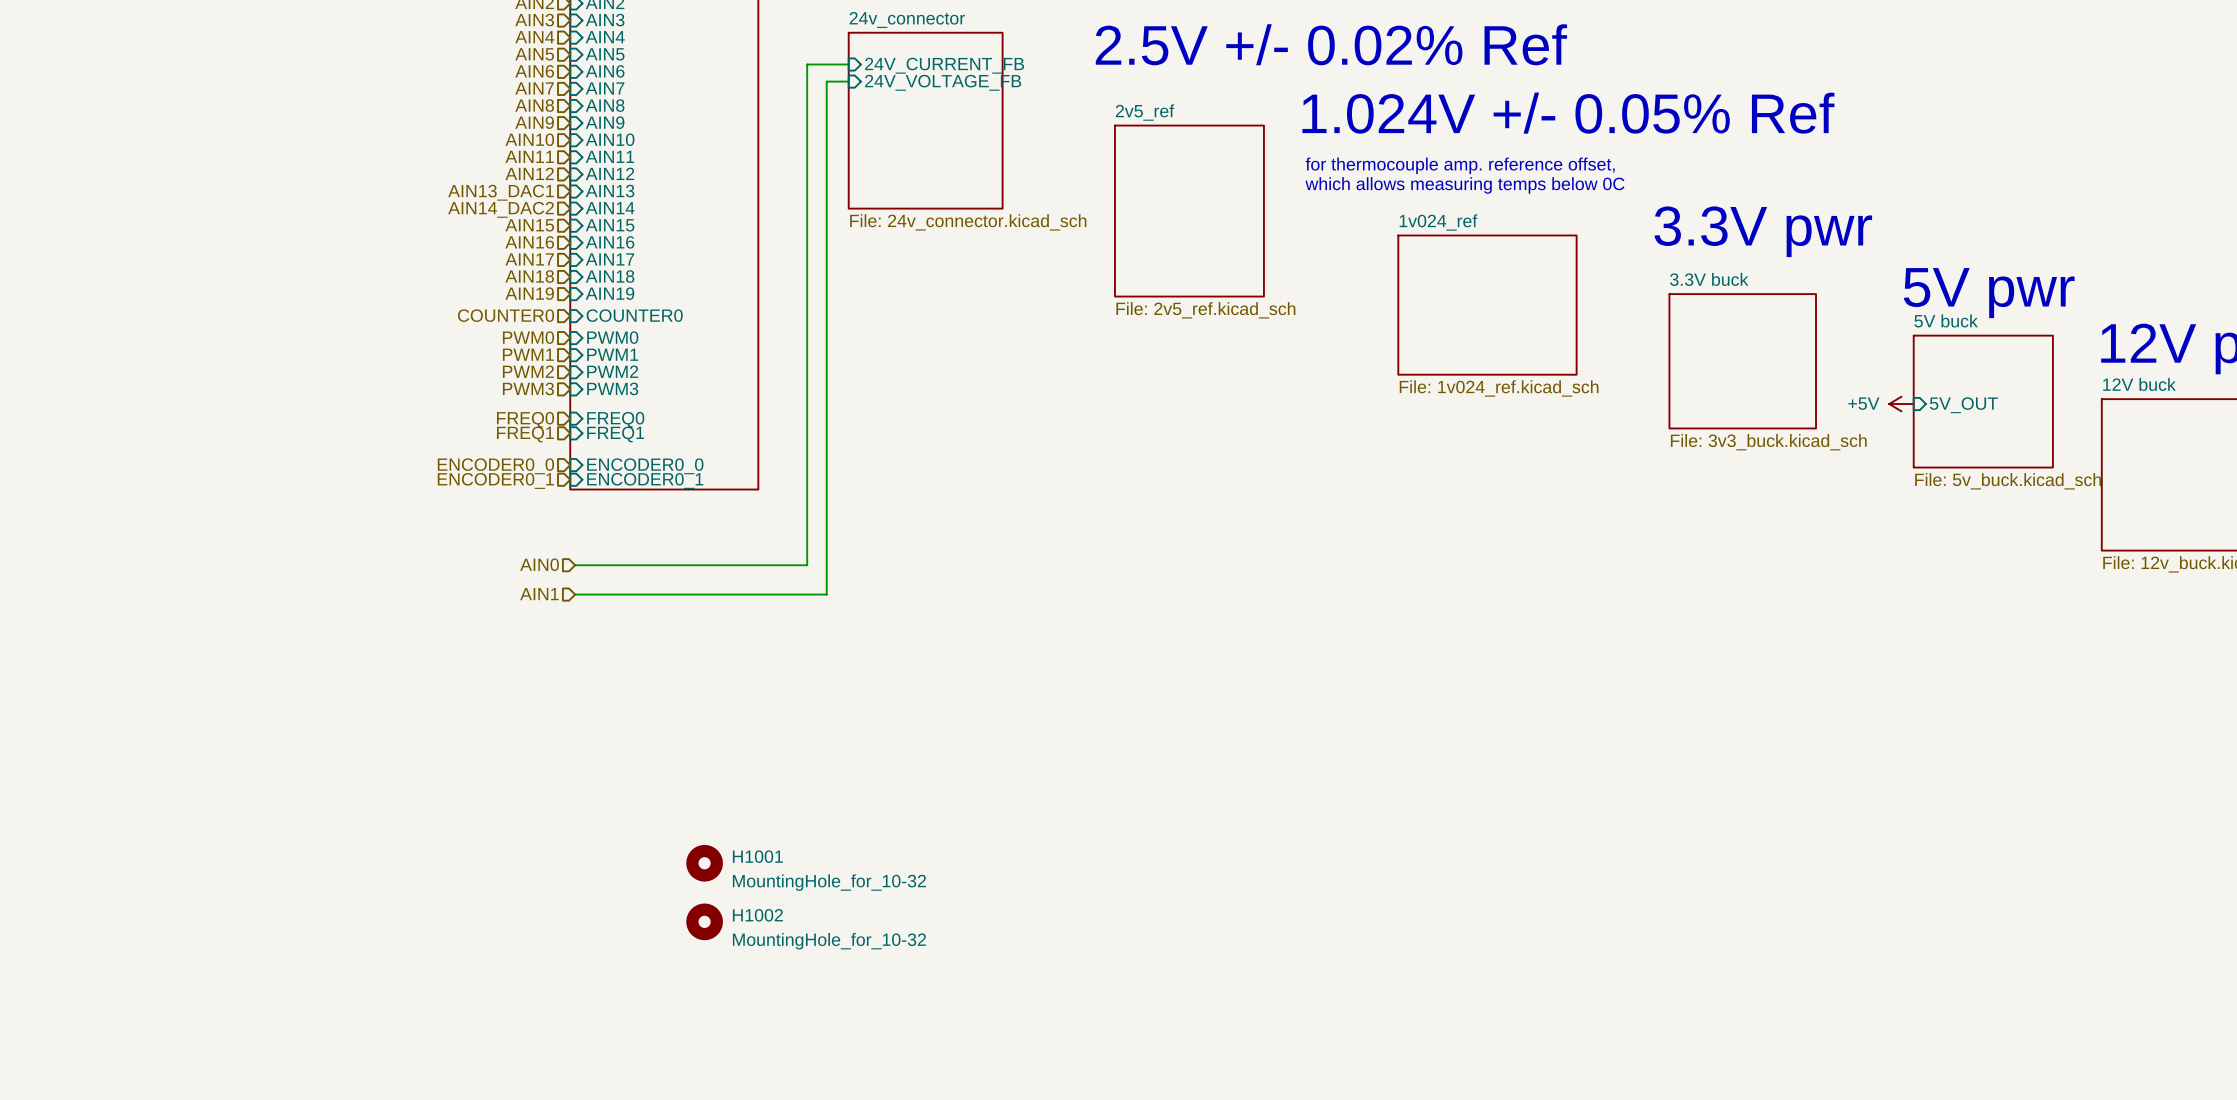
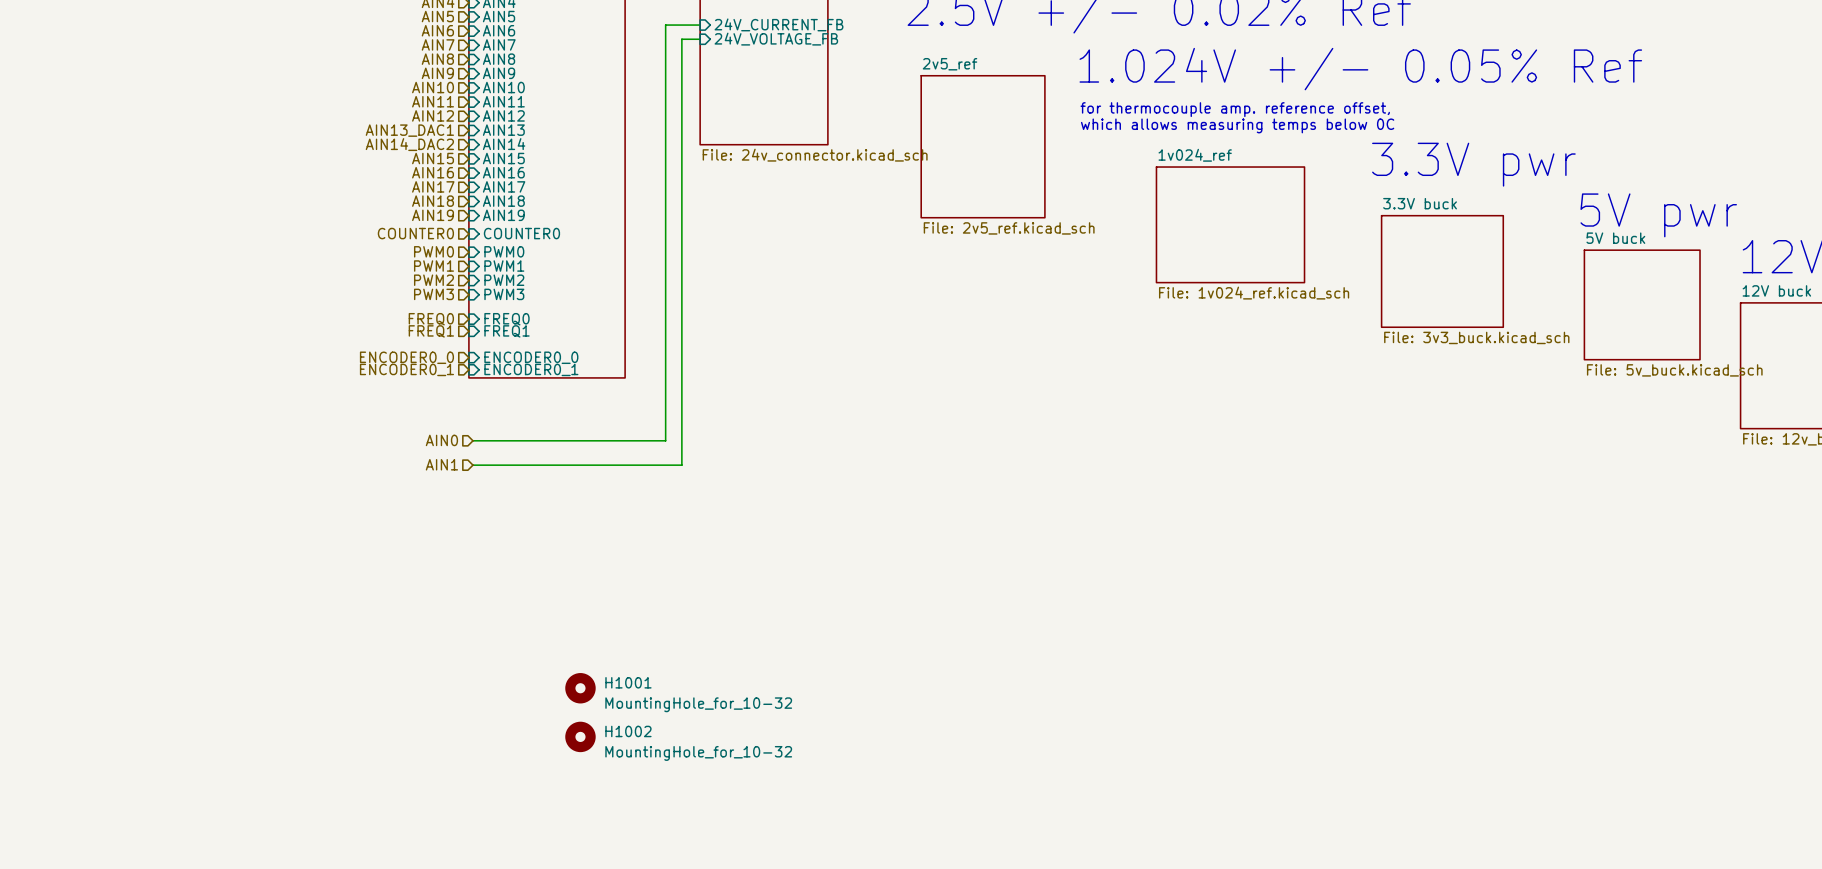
power symbol: +5V (1901, 404) -> none
sheet pin: 5V_OUT (1963, 405) -> none

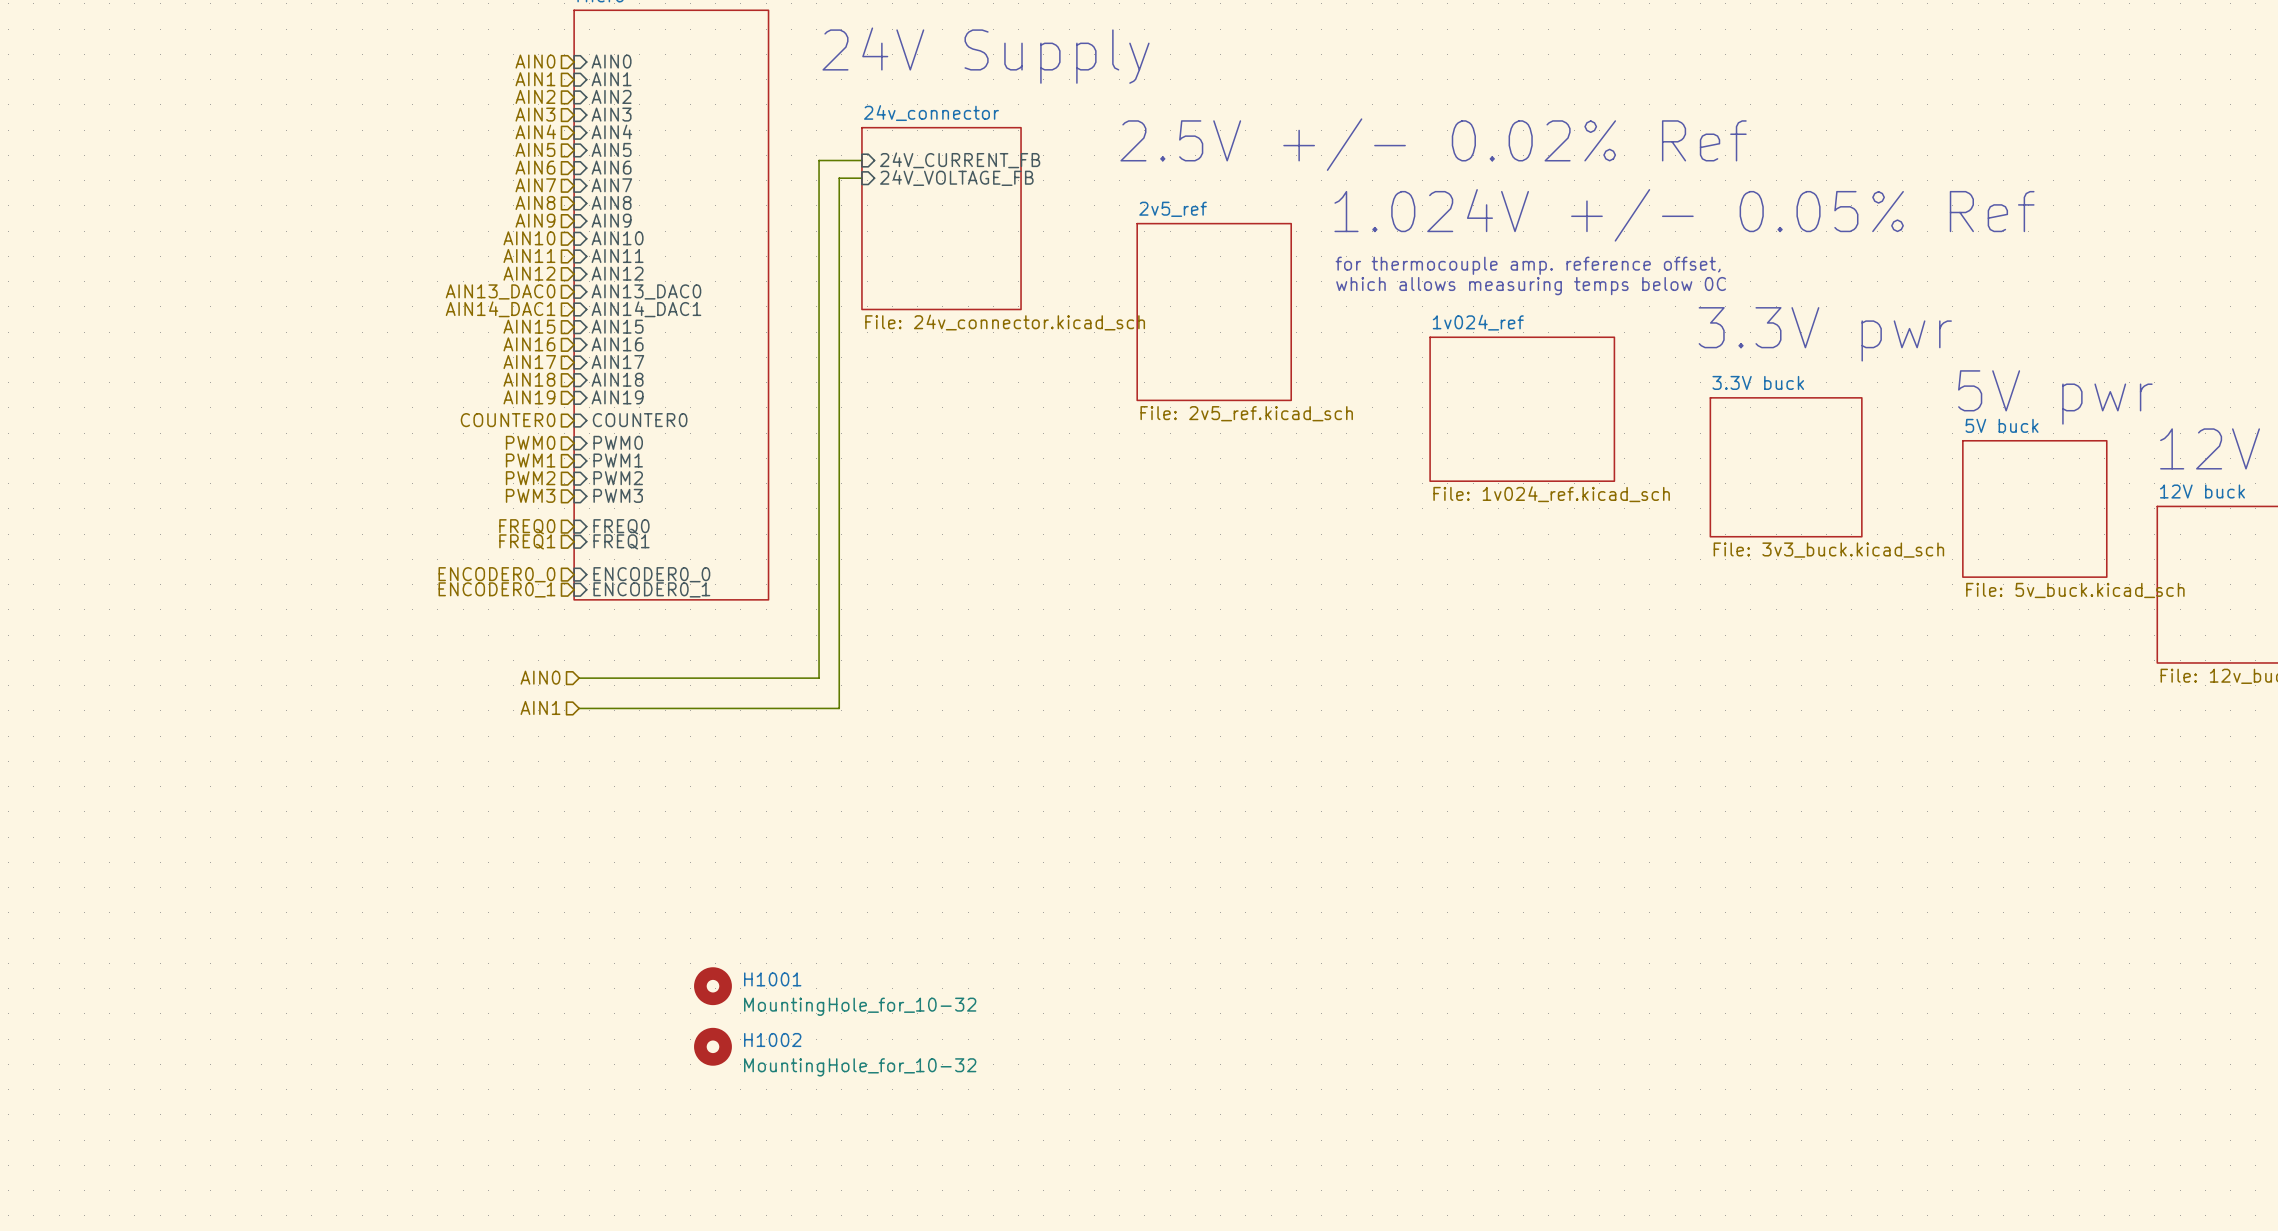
hierarchical label: AIN13_DAC1 (409, 130) -> AIN13_DAC0 (500, 291)
sheet pin: AIN13 (503, 130) -> AIN13_DAC0 (646, 291)
hierarchical label: AIN14_DAC2 (409, 144) -> AIN14_DAC1 (500, 309)
sheet pin: AIN14 (504, 144) -> AIN14_DAC1 (646, 309)

